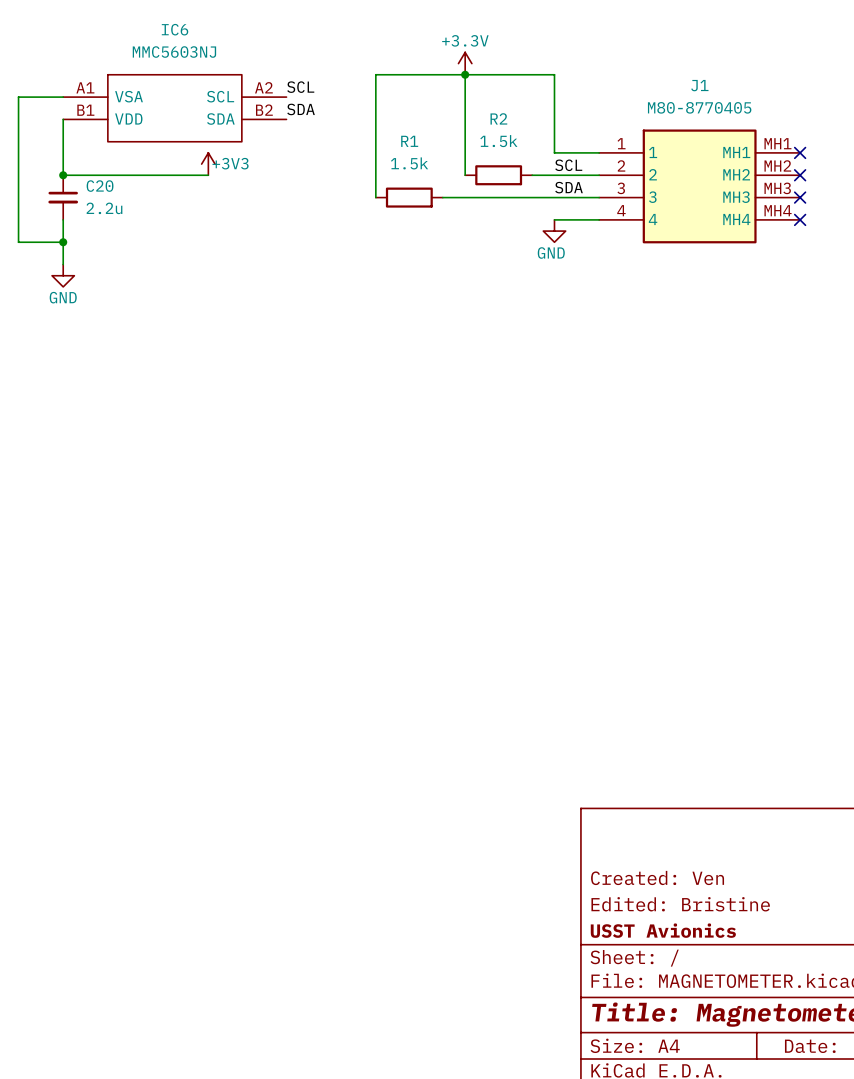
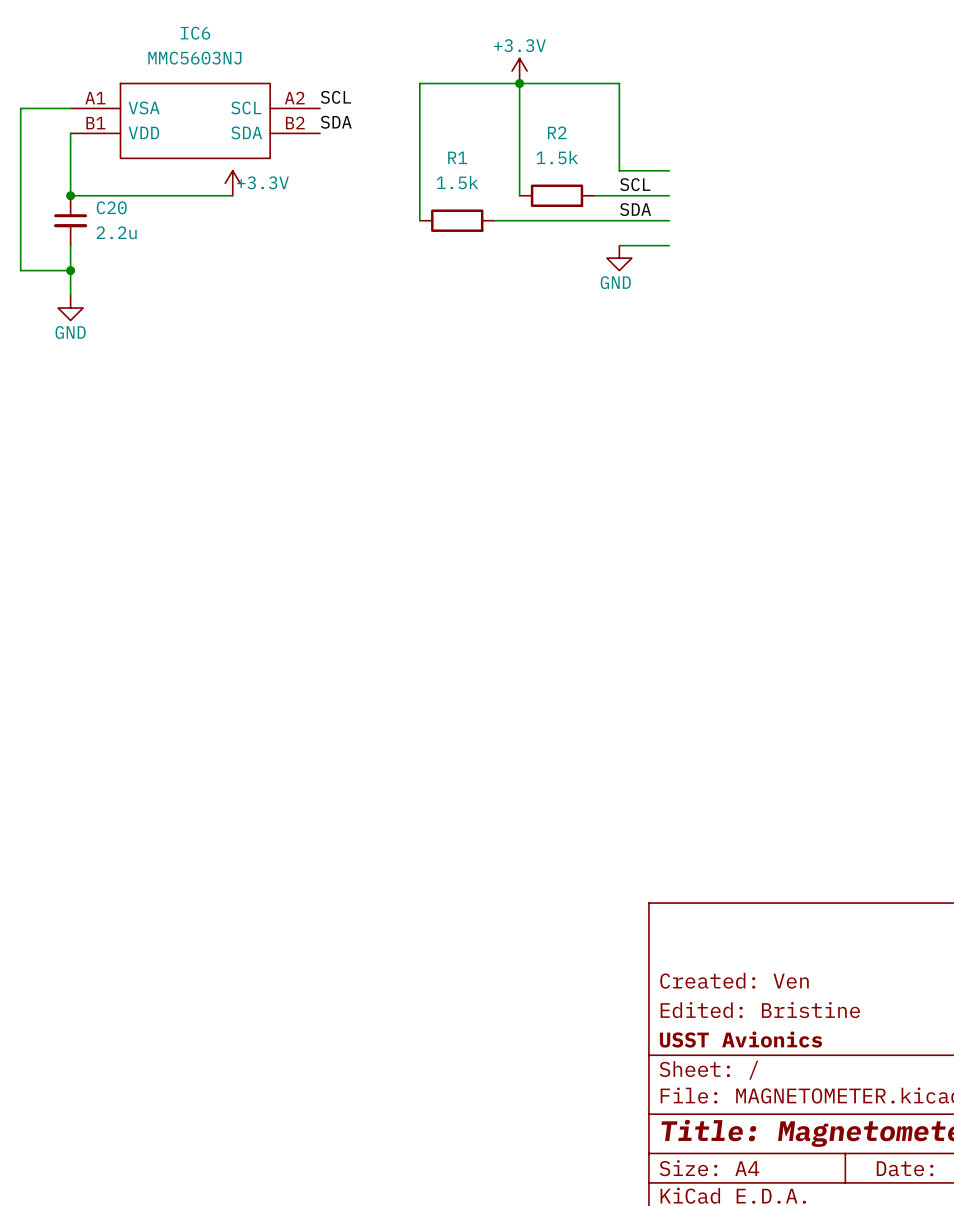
no-connect mark: (800, 152) -> none
power symbol: +3V3 (208, 164) -> +3.3V (232, 183)
no-connect mark: (800, 175) -> none
J1: M80-8770405 (699, 186) -> none
no-connect mark: (800, 197) -> none
no-connect mark: (800, 219) -> none

